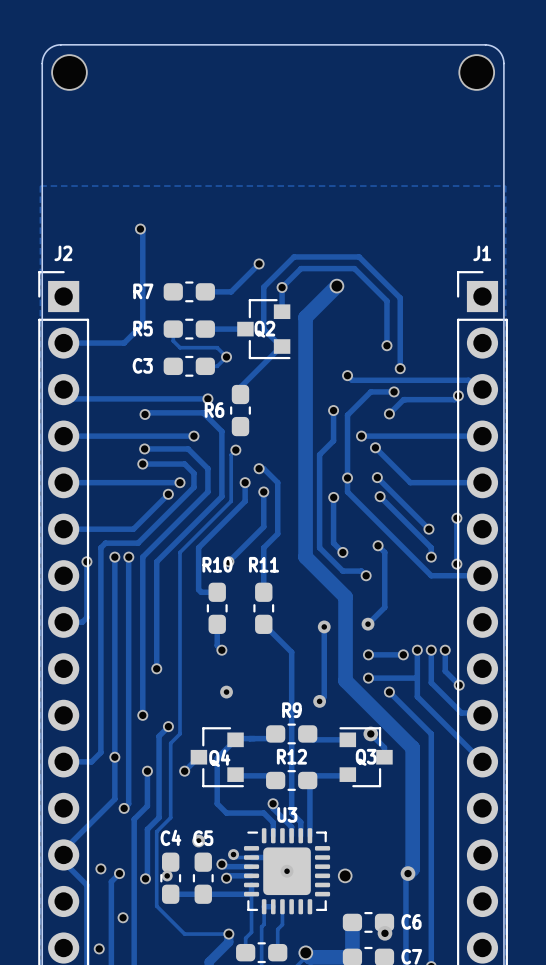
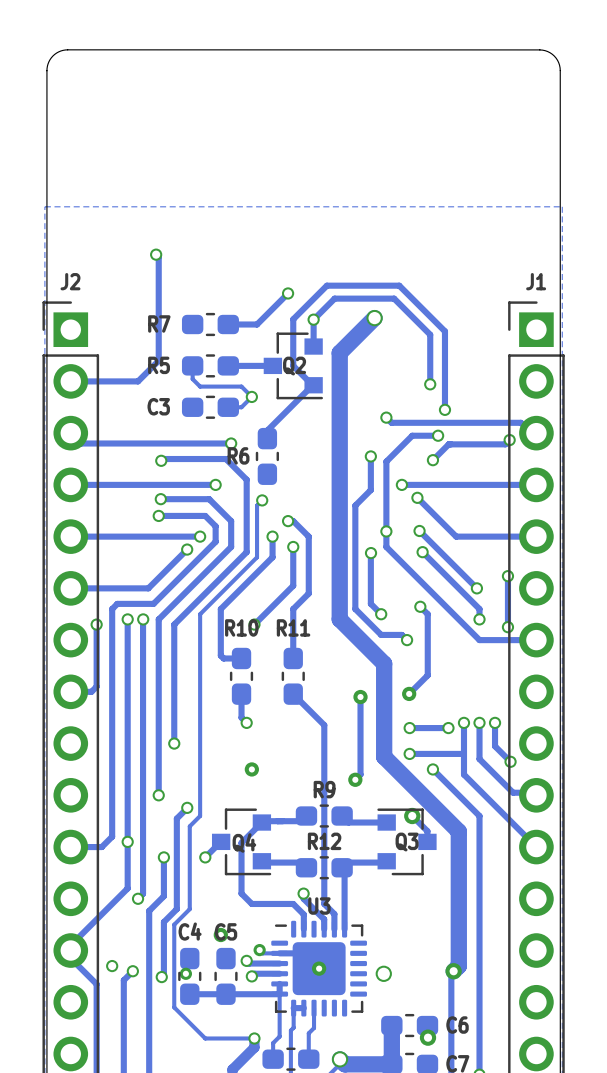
via: (69, 72) -> none
via: (476, 72) -> none
via: (123, 917) -> none
via: (99, 948) -> none

